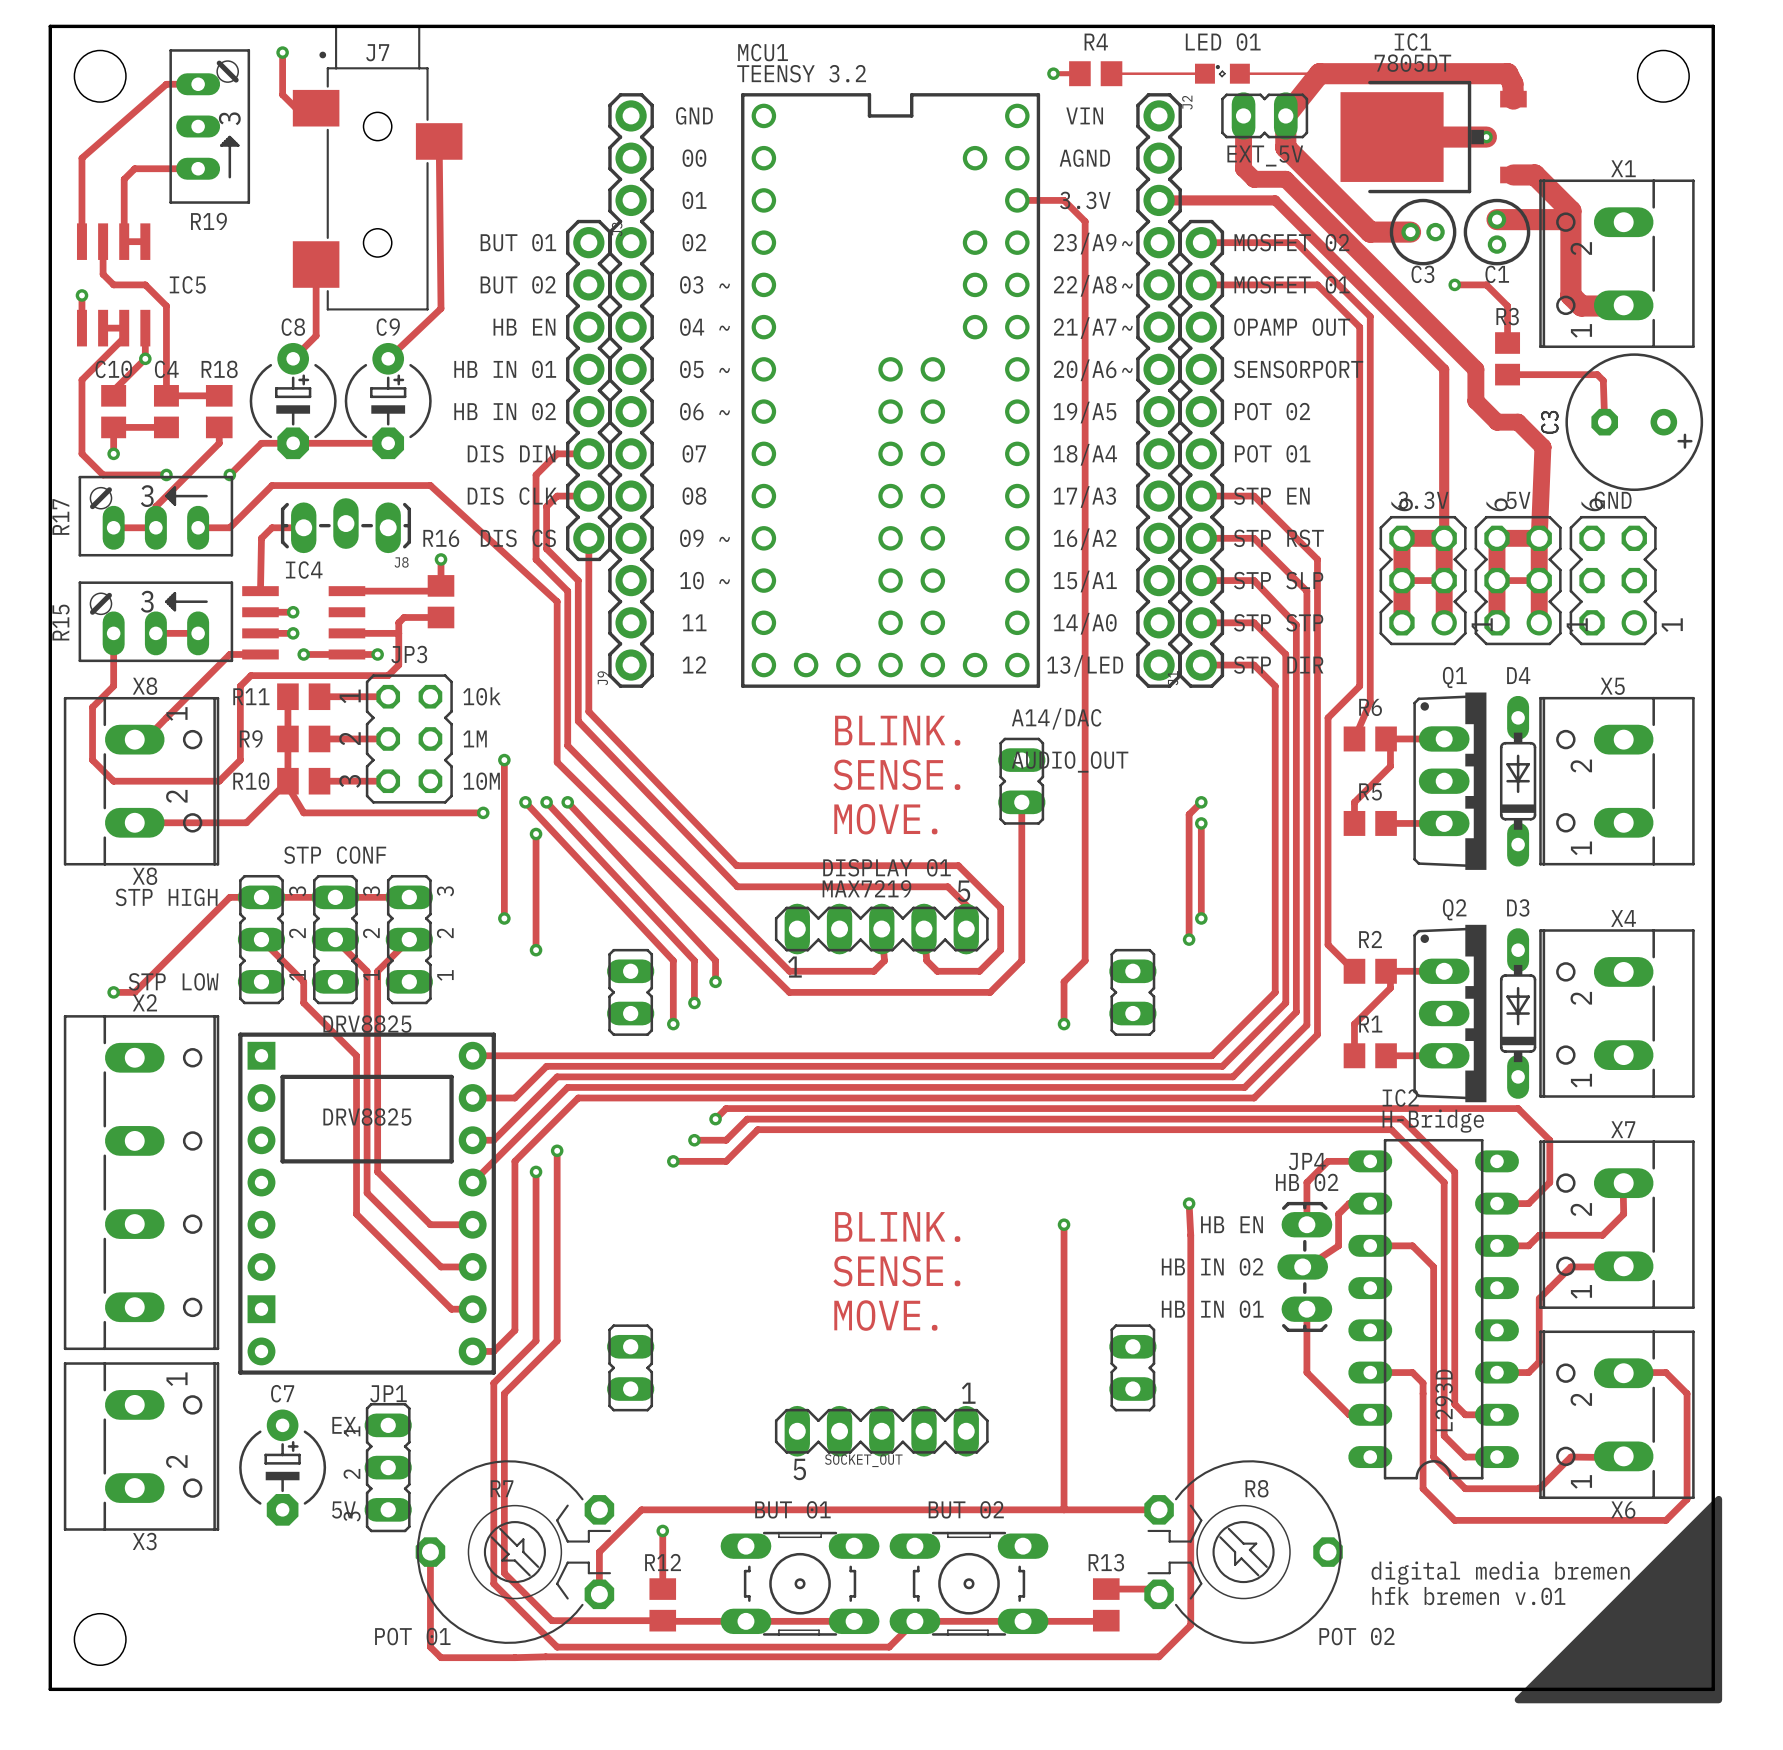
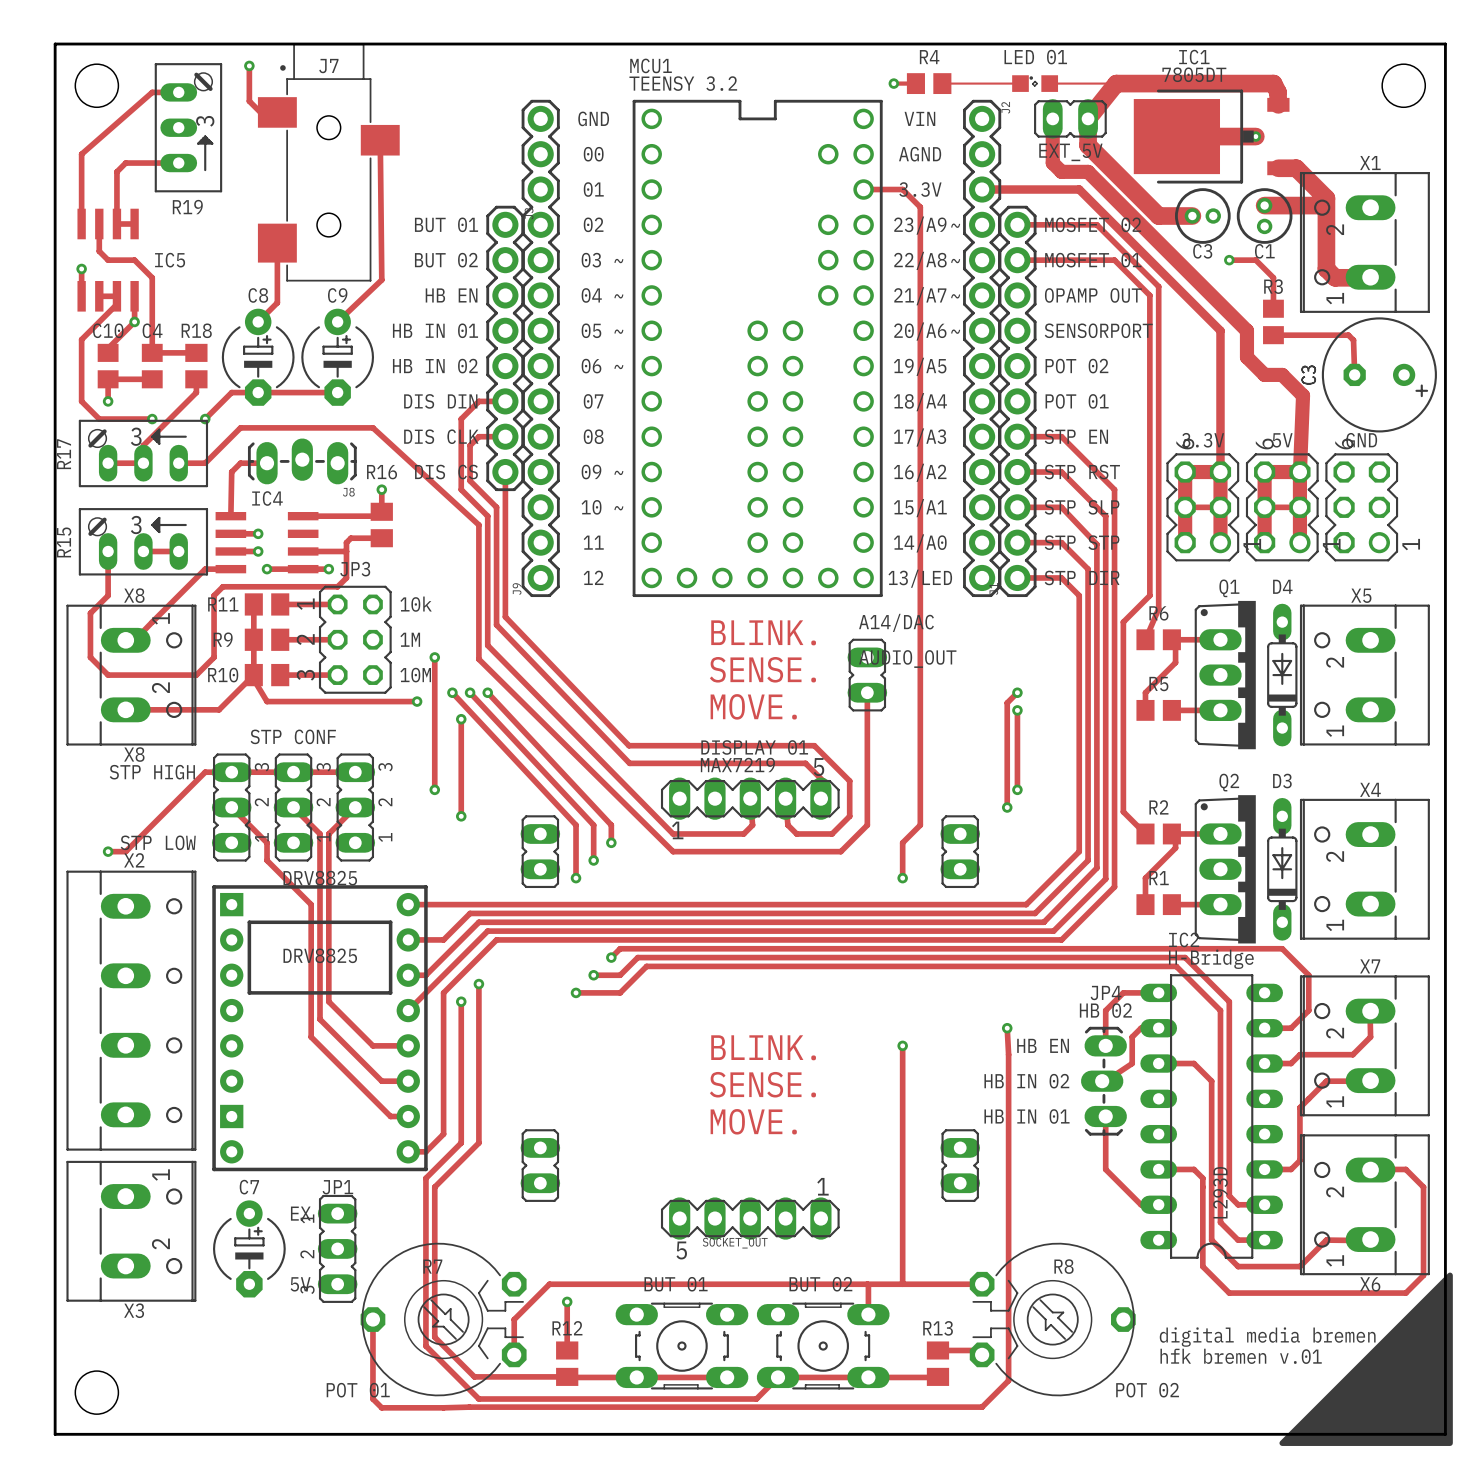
track: none -> (867, 1284) (868, 1314)

